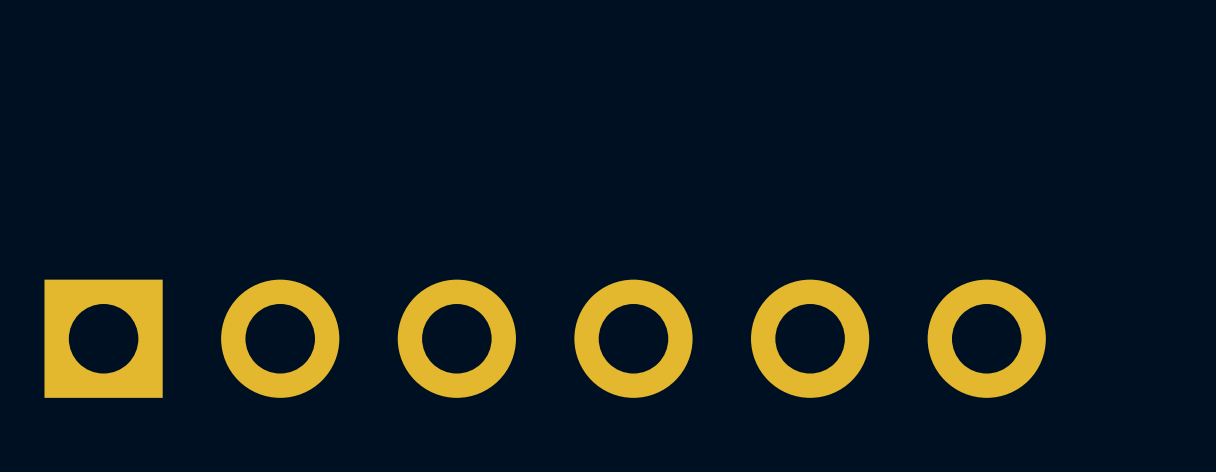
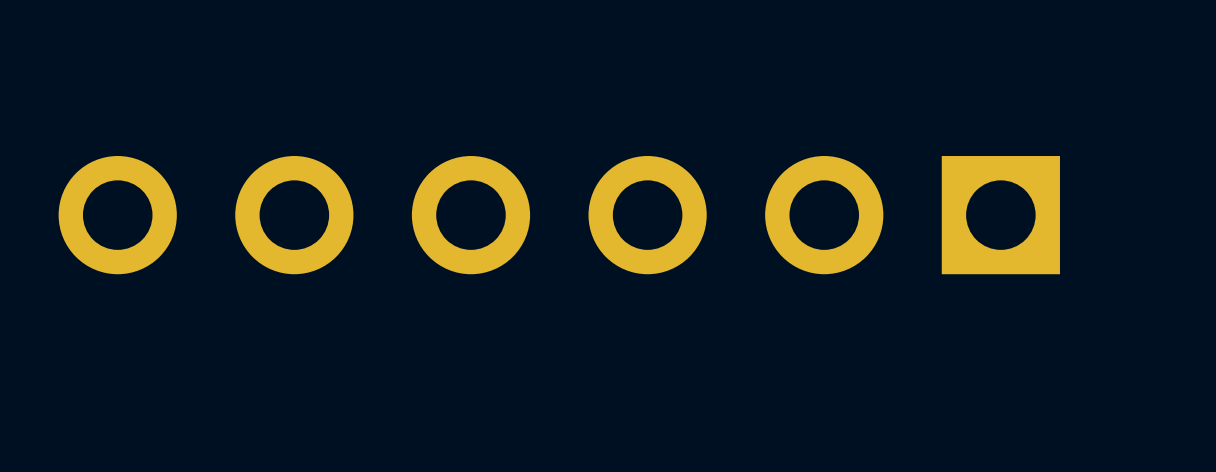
part rotation: 0° (545, 338) -> 180° (559, 215)

